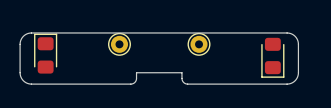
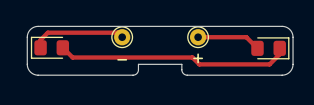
track: none -> (202, 32) (198, 37) (246, 37) (257, 48)
track: none -> (122, 37) (117, 32) (47, 32) (40, 39) (40, 47)
part rotation: 0° (45, 53) -> 90° counterclockwise (49, 47)
track: none -> (62, 47) (72, 57) (192, 57) (199, 64) (269, 64) (279, 54) (279, 48)
part rotation: 0° (272, 57) -> 90° counterclockwise (270, 48)
text: none -> + (198, 58)
text: none -> - (122, 59)

